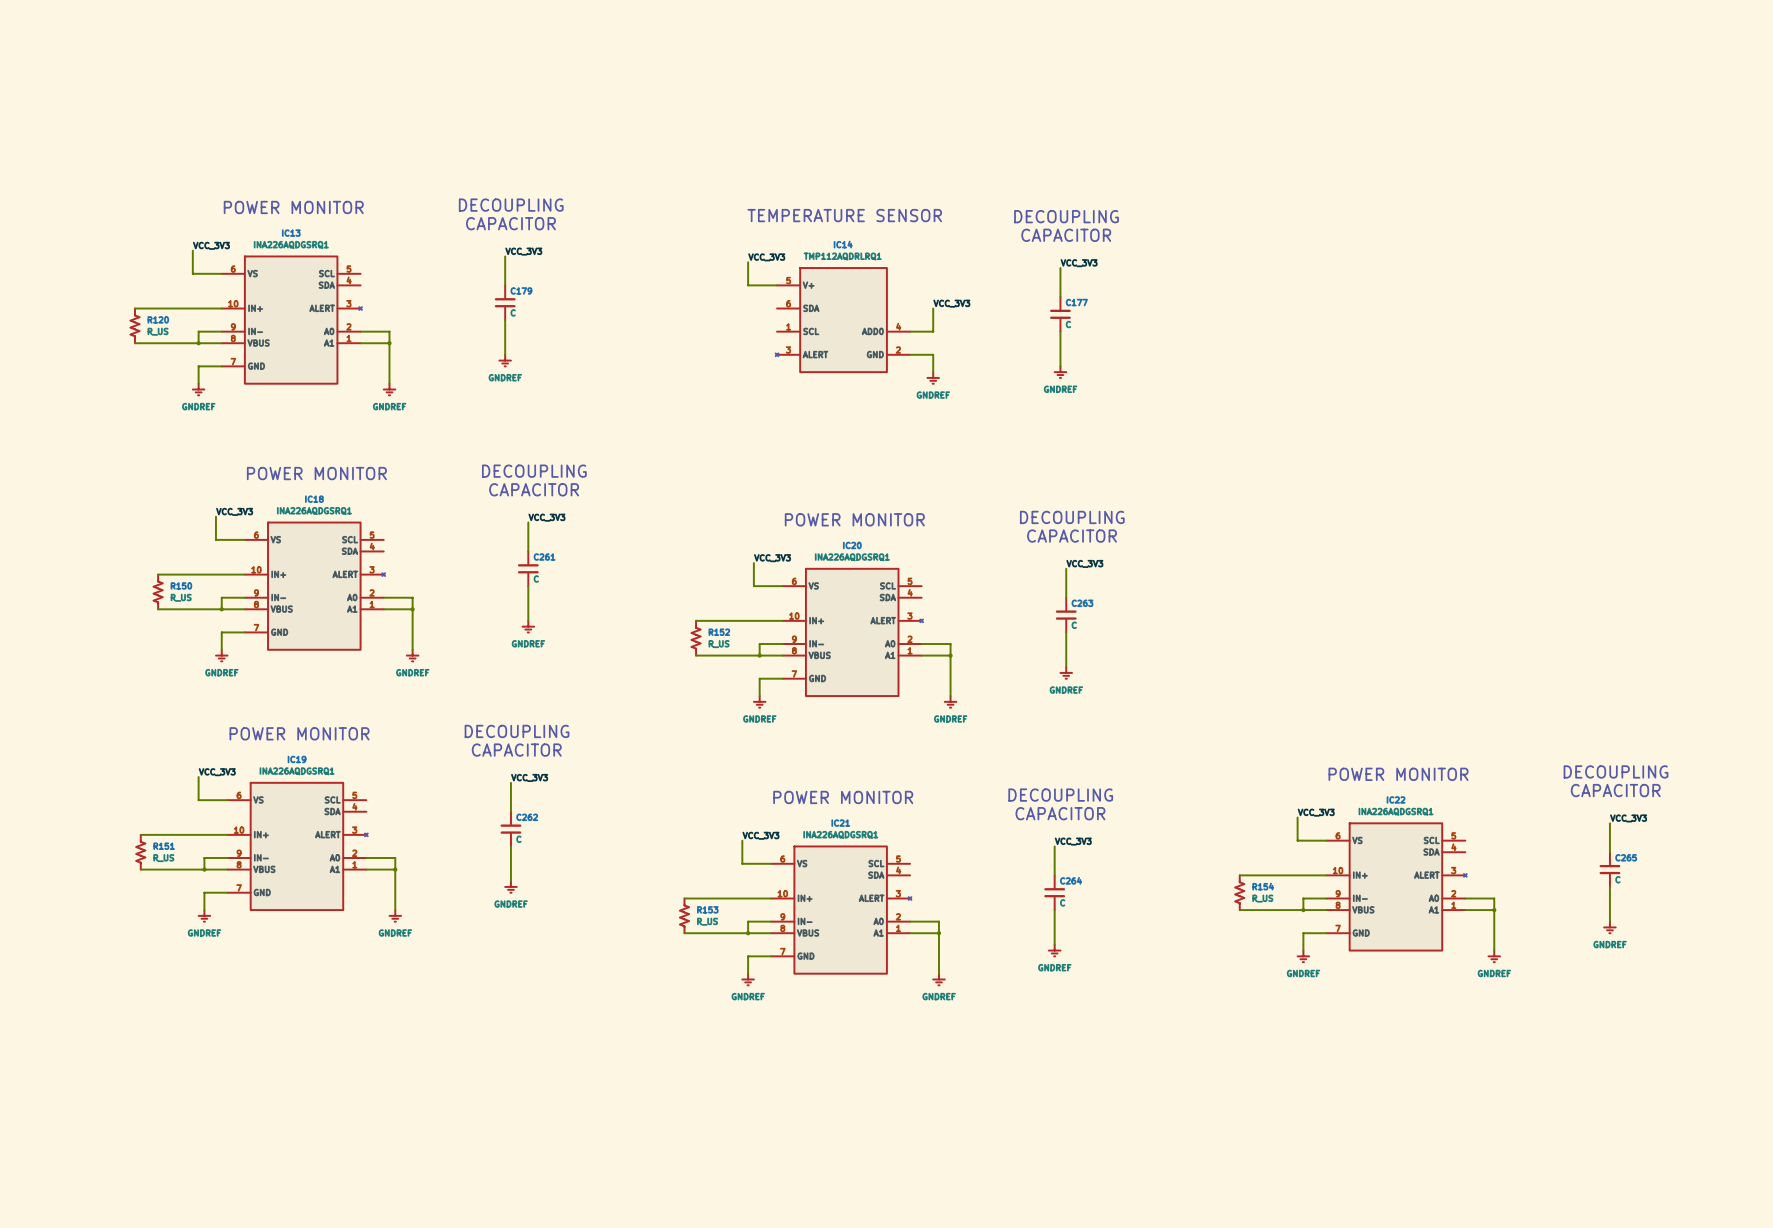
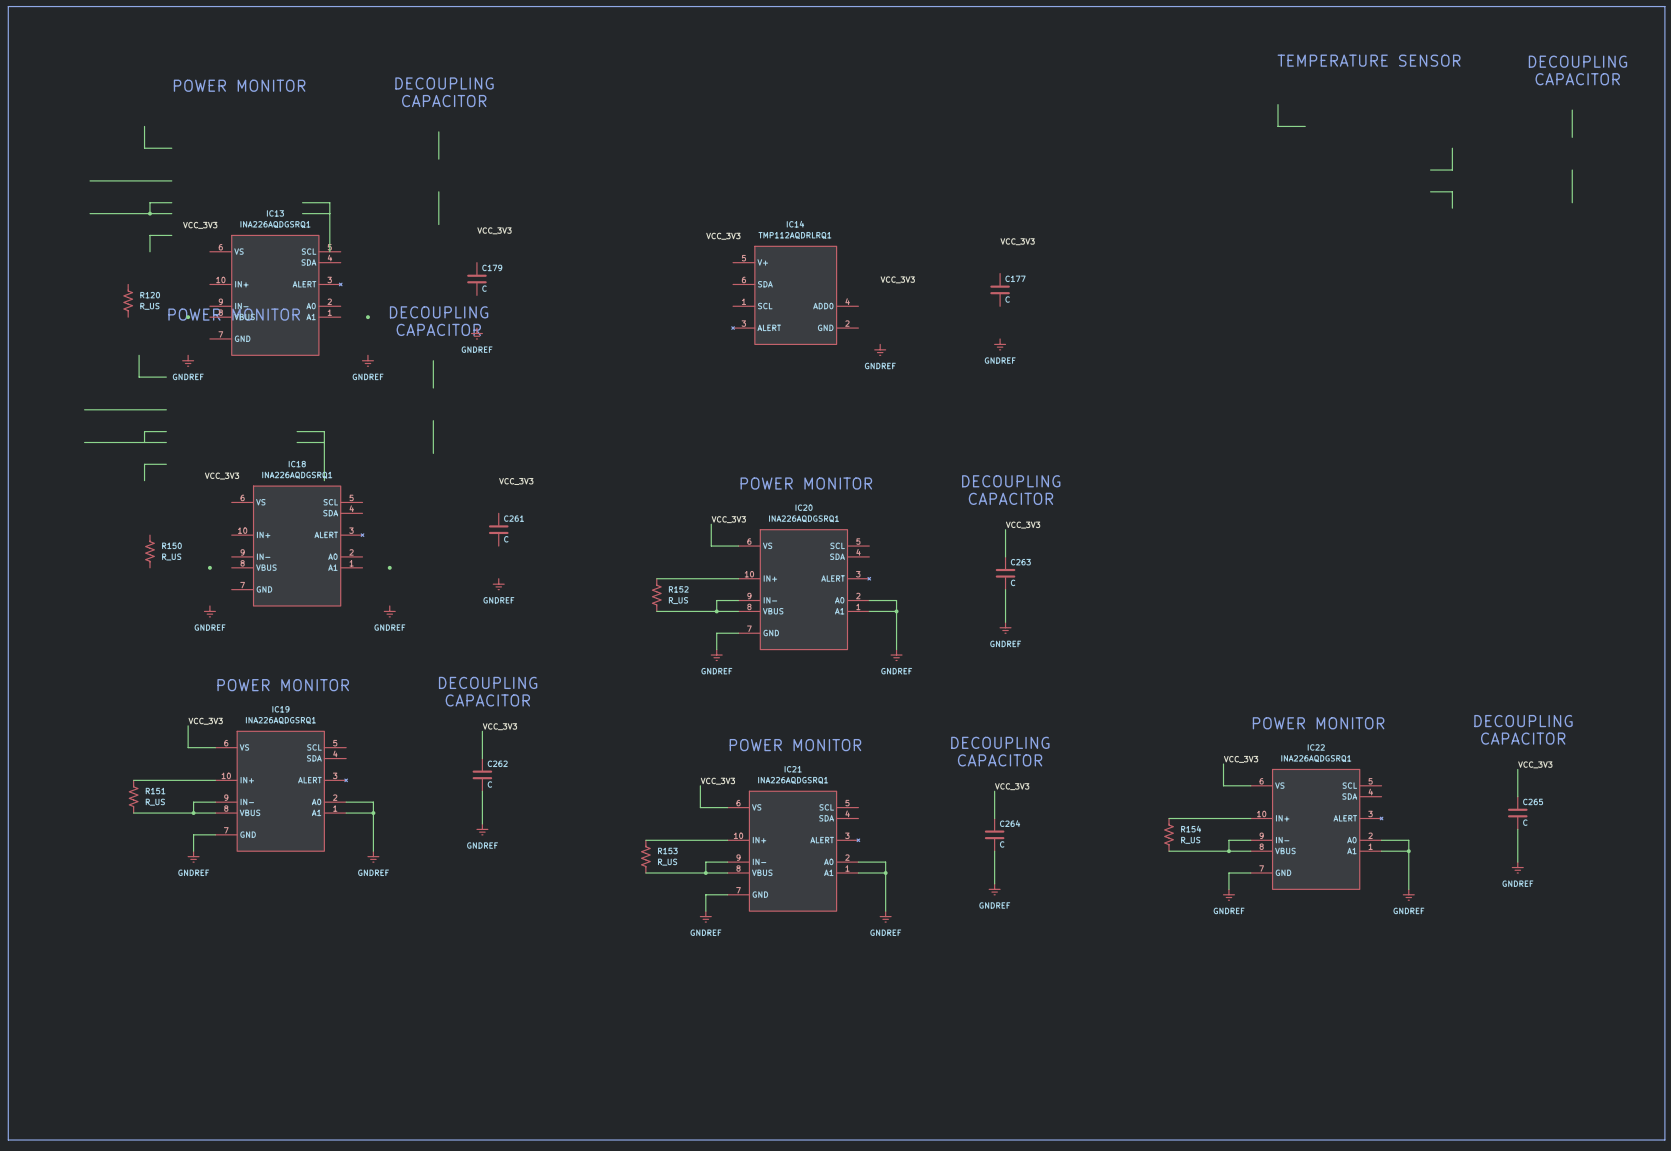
line: none -> (8, 6) (1664, 6) (1664, 1140) (8, 1140) (8, 6)
text: none -> TEMPERATURE SENSOR (1369, 60)
text: none -> DECOUPLING (1577, 61)
text: none -> CAPACITOR (1577, 79)
text: none -> DECOUPLING (444, 83)
text: none -> POWER MONITOR (239, 85)
text: none -> CAPACITOR (444, 101)
wire: none -> (1278, 104) (1278, 126) (1305, 126)
wire: none -> (1572, 110) (1572, 137)
wire: none -> (144, 126) (144, 148) (171, 148)
wire: none -> (438, 131) (438, 159)
wire: none -> (1452, 148) (1452, 170) (1430, 170)
wire: none -> (1572, 170) (1572, 202)
wire: none -> (90, 180) (171, 180)
text: DECOUPLING (511, 205) -> none
text: POWER MONITOR (293, 207) -> none
wire: none -> (438, 191) (438, 224)
wire: none -> (1430, 191) (1452, 191) (1452, 208)
text: TEMPERATURE SENSOR (844, 215) -> none
text: DECOUPLING (1066, 216) -> none
wire: none -> (171, 202) (149, 202) (149, 213)
wire: none -> (302, 202) (329, 202) (329, 251)
text: CAPACITOR (510, 223) -> none
junction: none -> (149, 213)
wire: none -> (302, 213) (329, 213)
text: CAPACITOR (1066, 235) -> none
wire: (192, 250) (192, 273) (221, 273) -> none
wire: none -> (171, 235) (149, 235) (149, 251)
wire: (505, 256) (505, 285) -> none
wire: (748, 262) (748, 285) (777, 285) -> none
wire: (1060, 268) (1060, 296) -> none
wire: (134, 308) (221, 308) -> (90, 213) (171, 213)
wire: (933, 308) (933, 331) (910, 331) -> none
wire: (505, 320) (505, 354) -> none
wire: (221, 331) (198, 331) (198, 343) -> none
wire: (360, 331) (389, 331) (389, 383) -> none
wire: (1060, 331) (1060, 366) -> none
text: none -> DECOUPLING (439, 312)
text: none -> POWER MONITOR (234, 314)
wire: (134, 343) (221, 343) -> (84, 409) (166, 409)
wire: (360, 343) (389, 343) -> none
wire: (910, 354) (933, 354) (933, 372) -> none
text: none -> CAPACITOR (438, 329)
wire: (221, 366) (198, 366) (198, 383) -> none
wire: none -> (139, 355) (139, 377) (166, 377)
wire: none -> (433, 360) (433, 388)
wire: none -> (433, 420) (433, 453)
wire: none -> (166, 431) (144, 431) (144, 442)
wire: none -> (297, 431) (324, 431) (324, 480)
text: DECOUPLING (534, 471) -> none
text: POWER MONITOR (316, 473) -> none
wire: none -> (84, 442) (166, 442)
wire: none -> (297, 442) (324, 442)
text: CAPACITOR (534, 489) -> none
wire: none -> (166, 464) (144, 464) (144, 480)
wire: (215, 516) (215, 539) (244, 539) -> none
wire: (528, 522) (528, 551) -> none
wire: (158, 574) (244, 574) -> none
wire: (528, 586) (528, 620) -> none
wire: (244, 597) (221, 597) (221, 609) -> none
wire: (383, 597) (412, 597) (412, 649) -> none
wire: (158, 609) (244, 609) -> none
wire: (383, 609) (412, 609) -> none
wire: (244, 632) (221, 632) (221, 649) -> none

